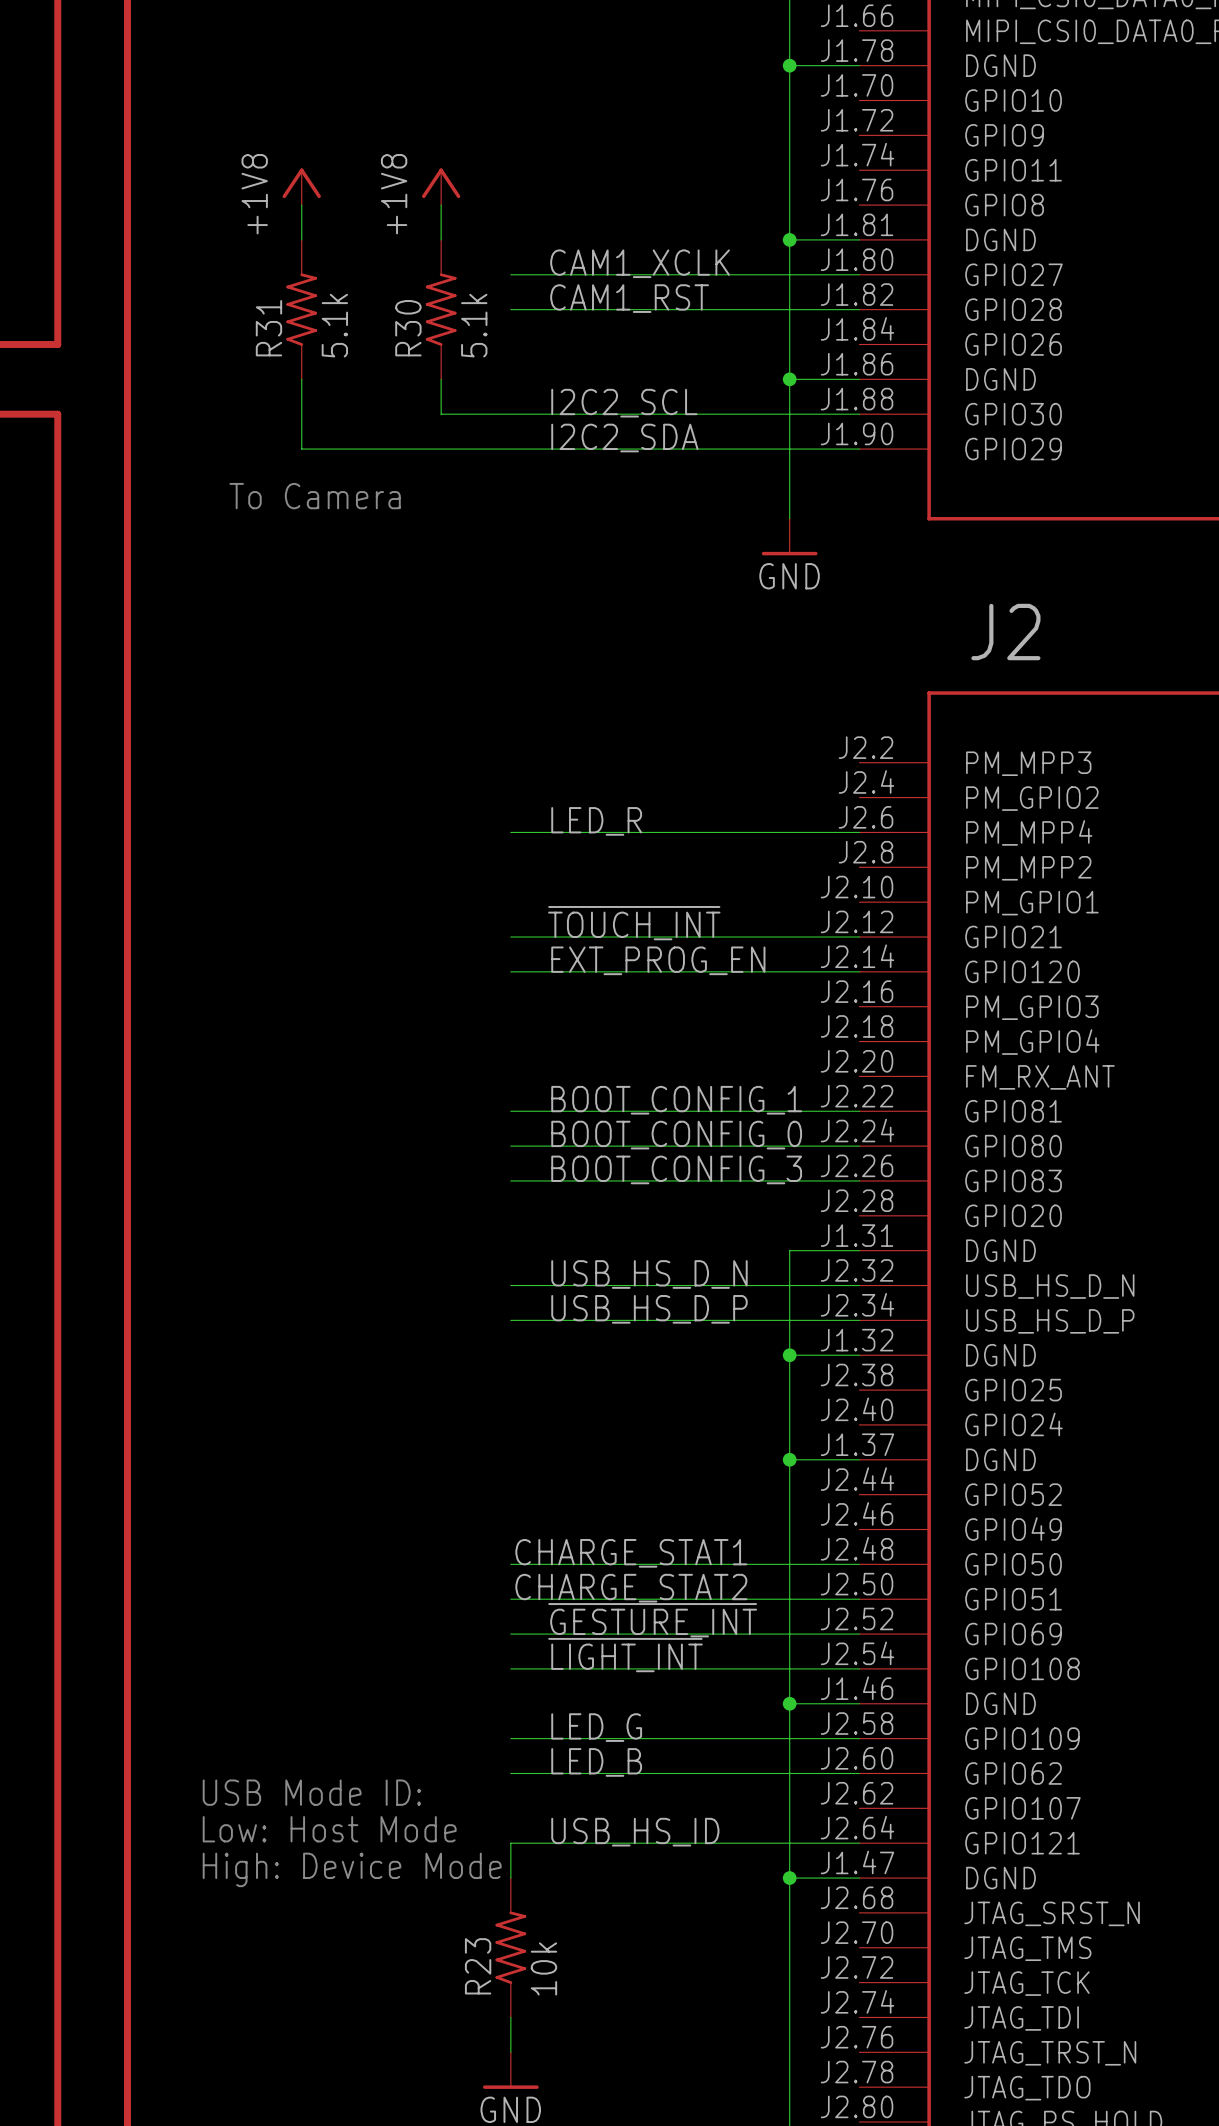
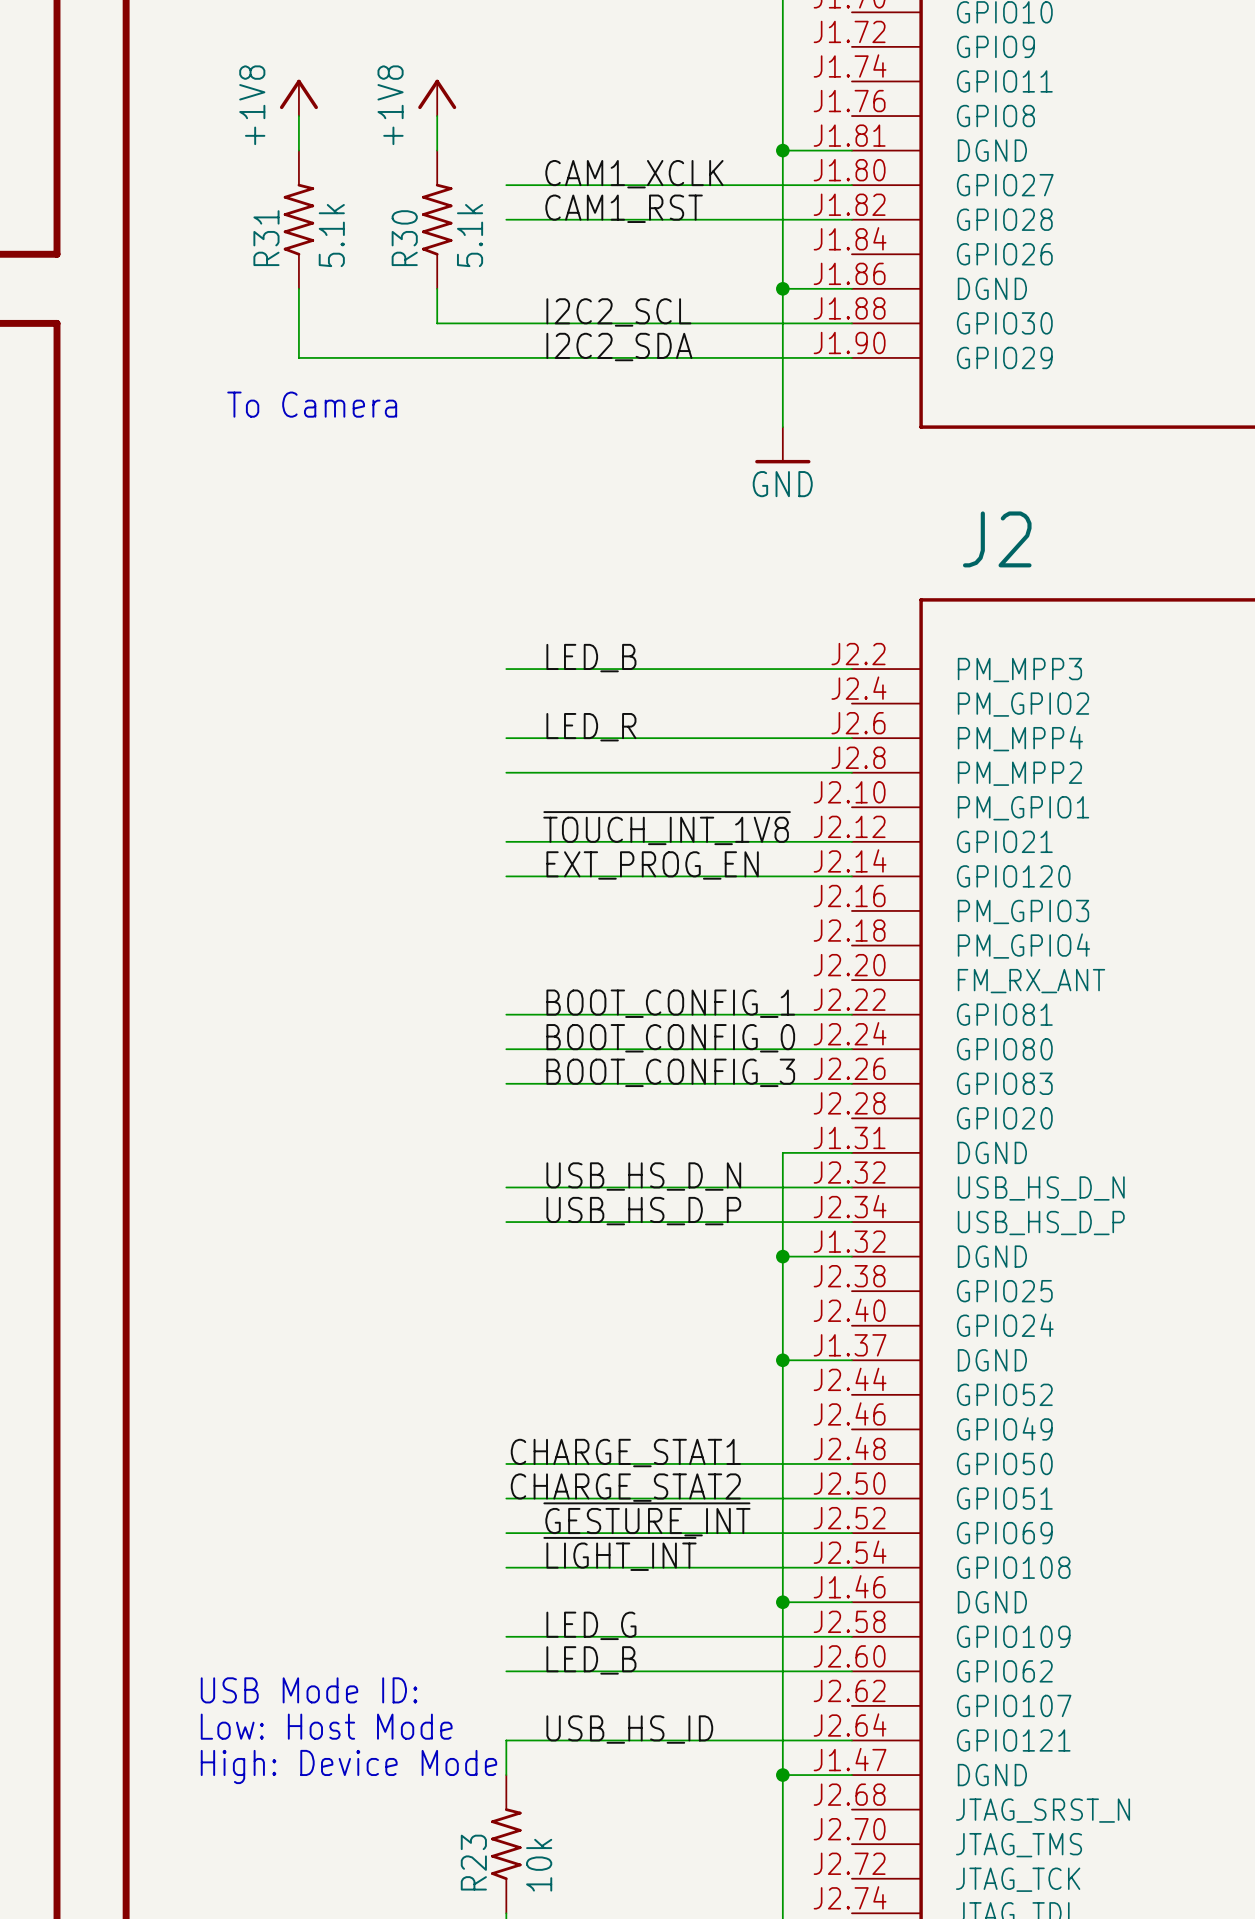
label: none -> LED_B (591, 658)
wire: none -> (506, 669) (851, 669)
wire: none -> (506, 772) (851, 772)
label: ~{TOUCH_INT} (634, 923) -> ~{TOUCH_INT_1V8} (667, 828)

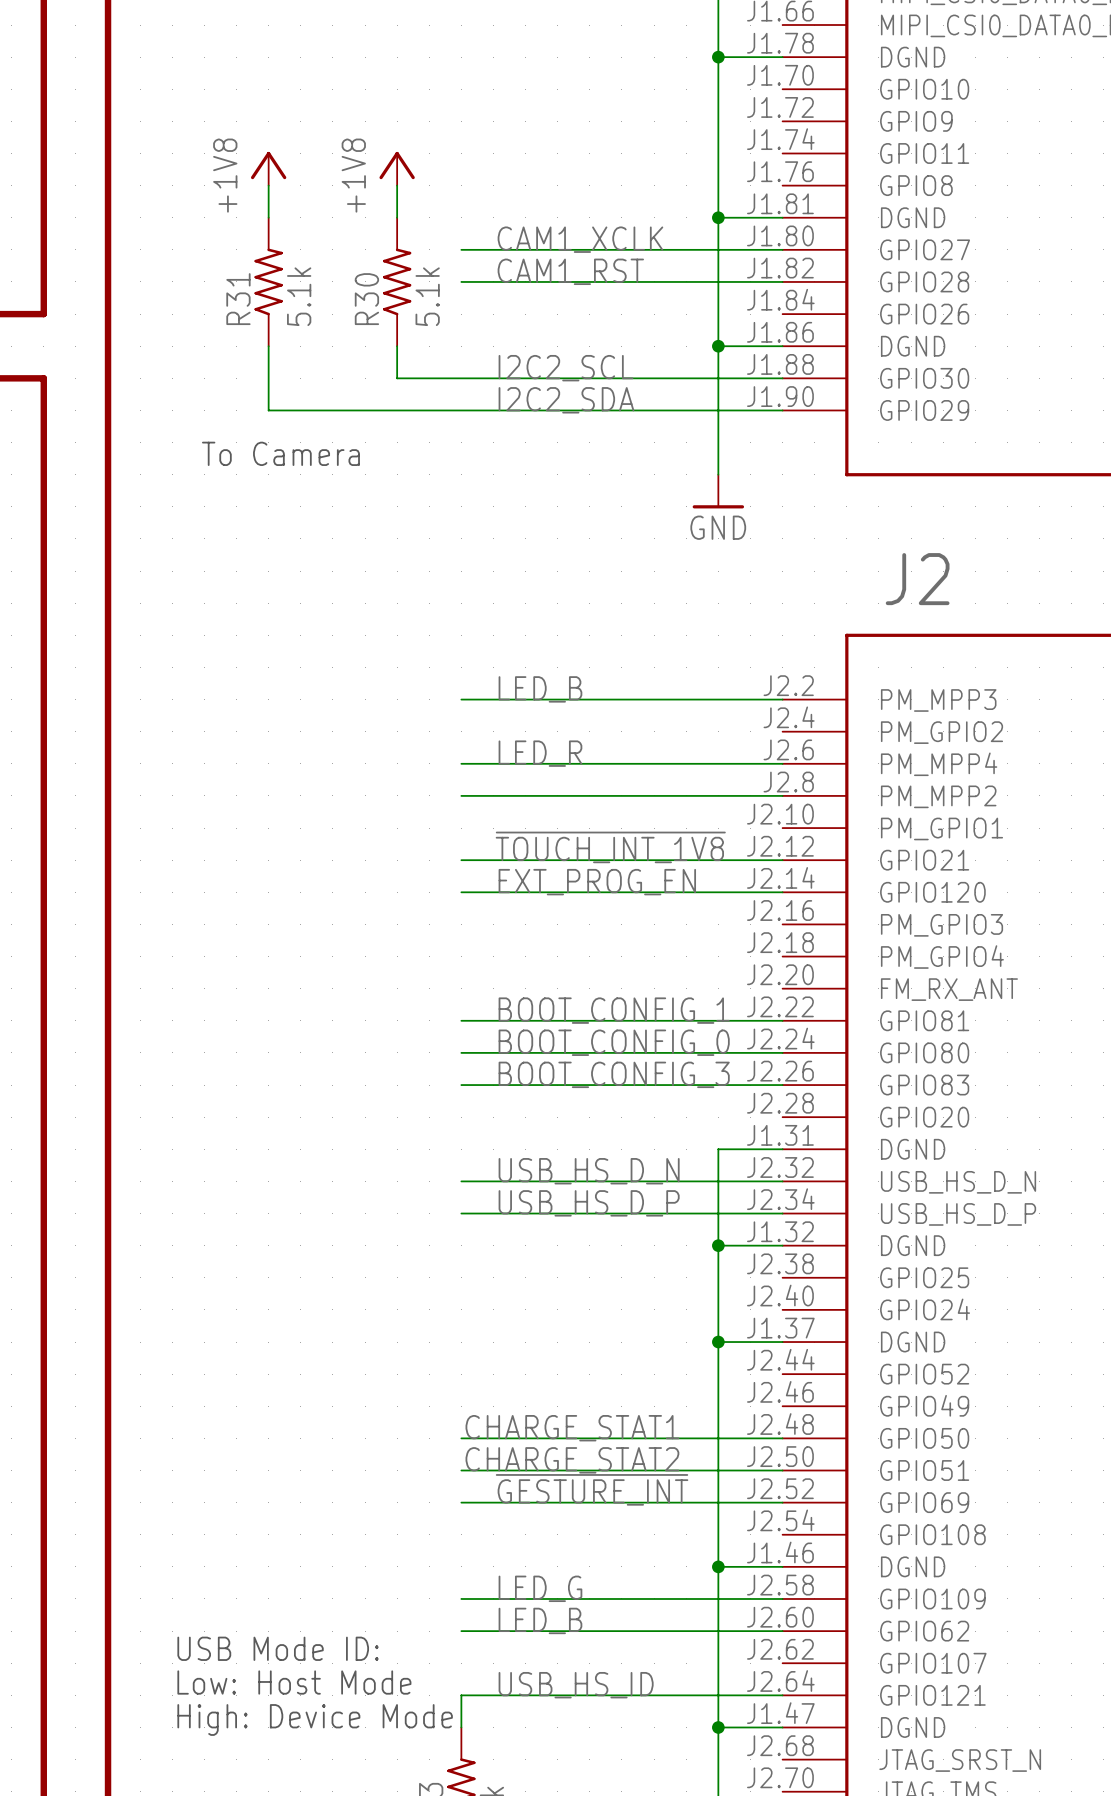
label: ~{LIGHT_INT} (619, 1553) -> none
wire: (506, 1567) (851, 1567) -> none

